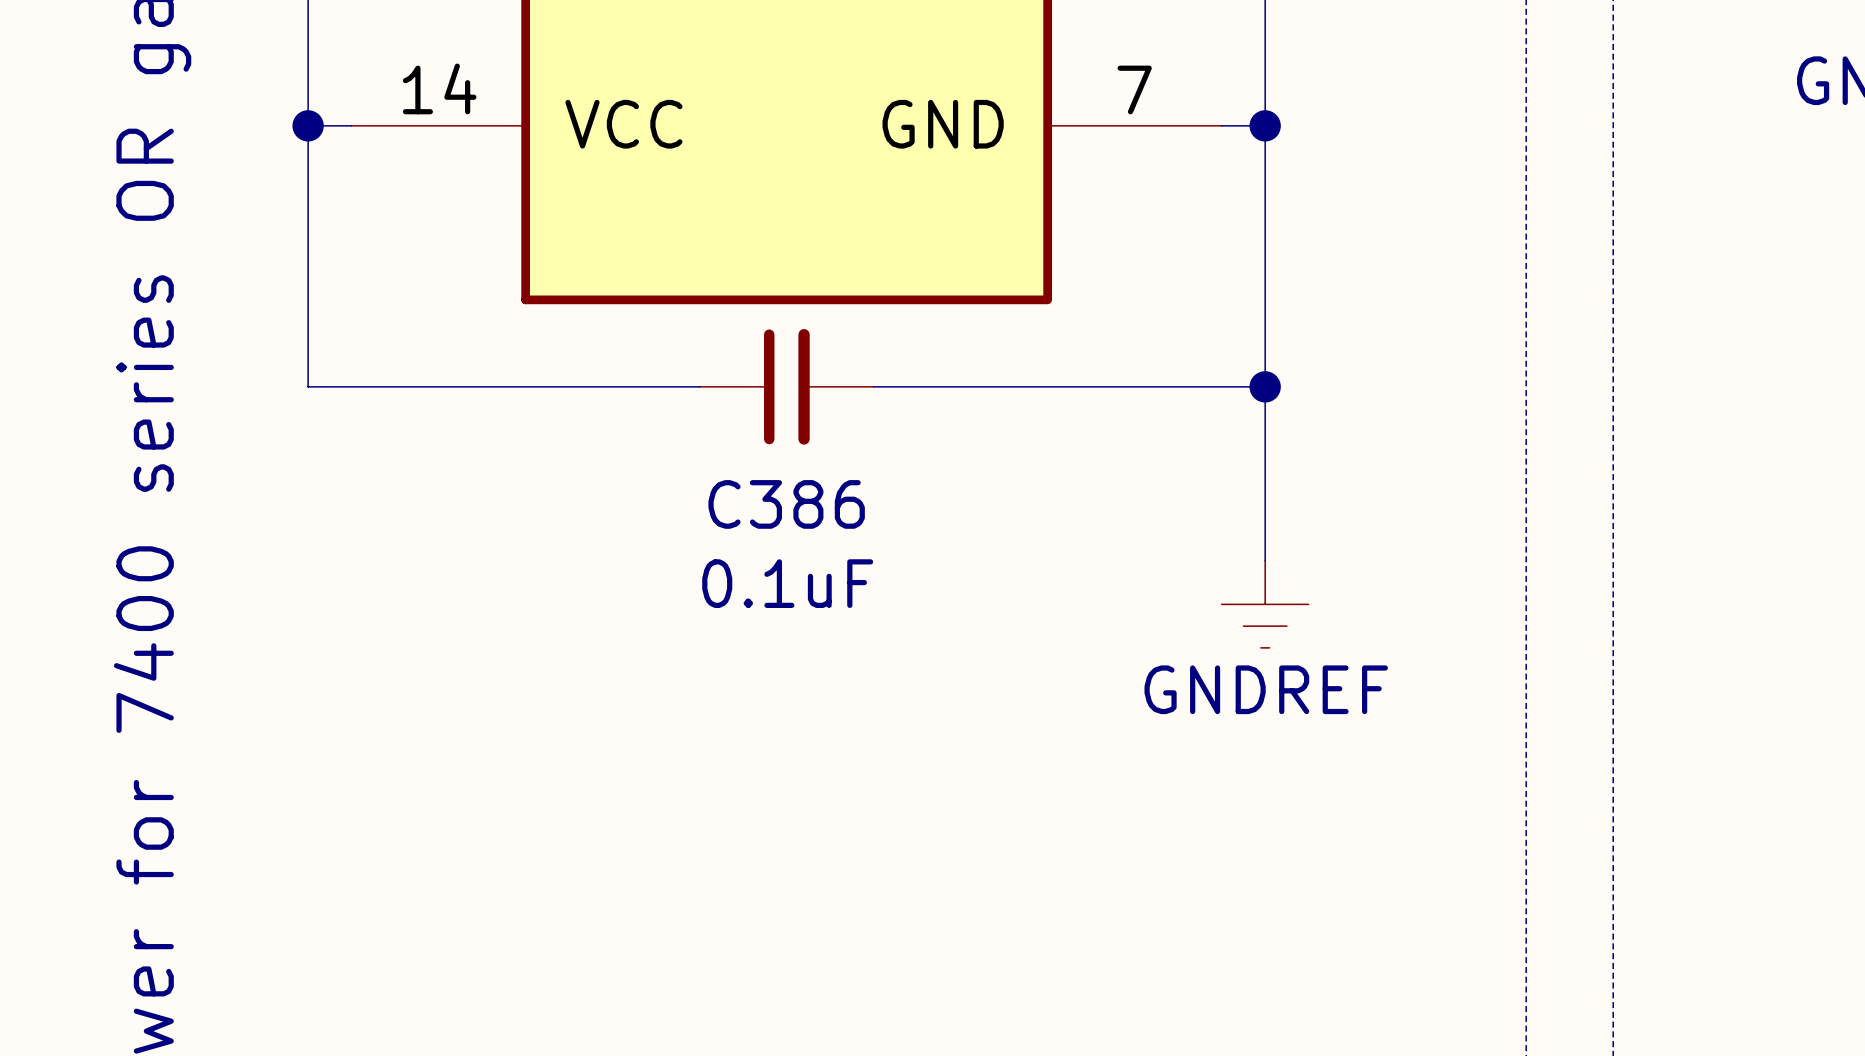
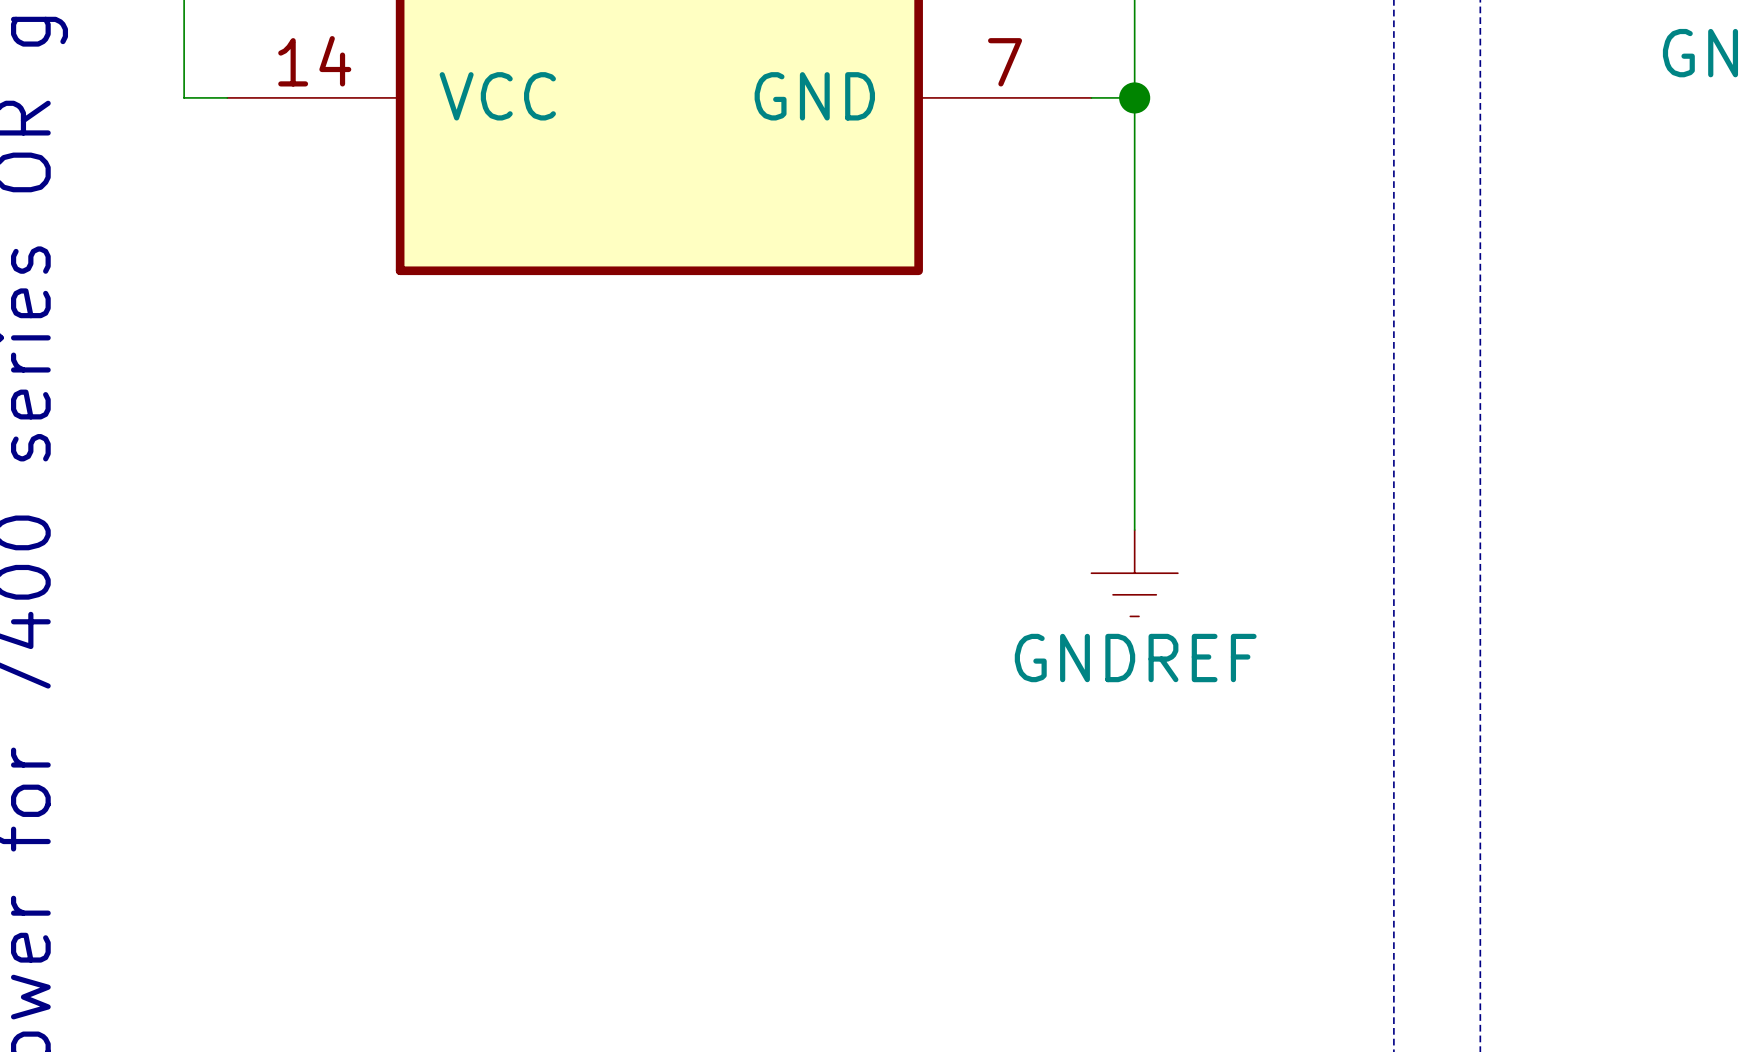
wire: (308, 125) (308, 386) (699, 386) -> none
junction: (308, 125) -> none
C386: 0.1uF (786, 386) -> none
wire: (873, 386) (1265, 386) -> none
junction: (1265, 386) -> none

